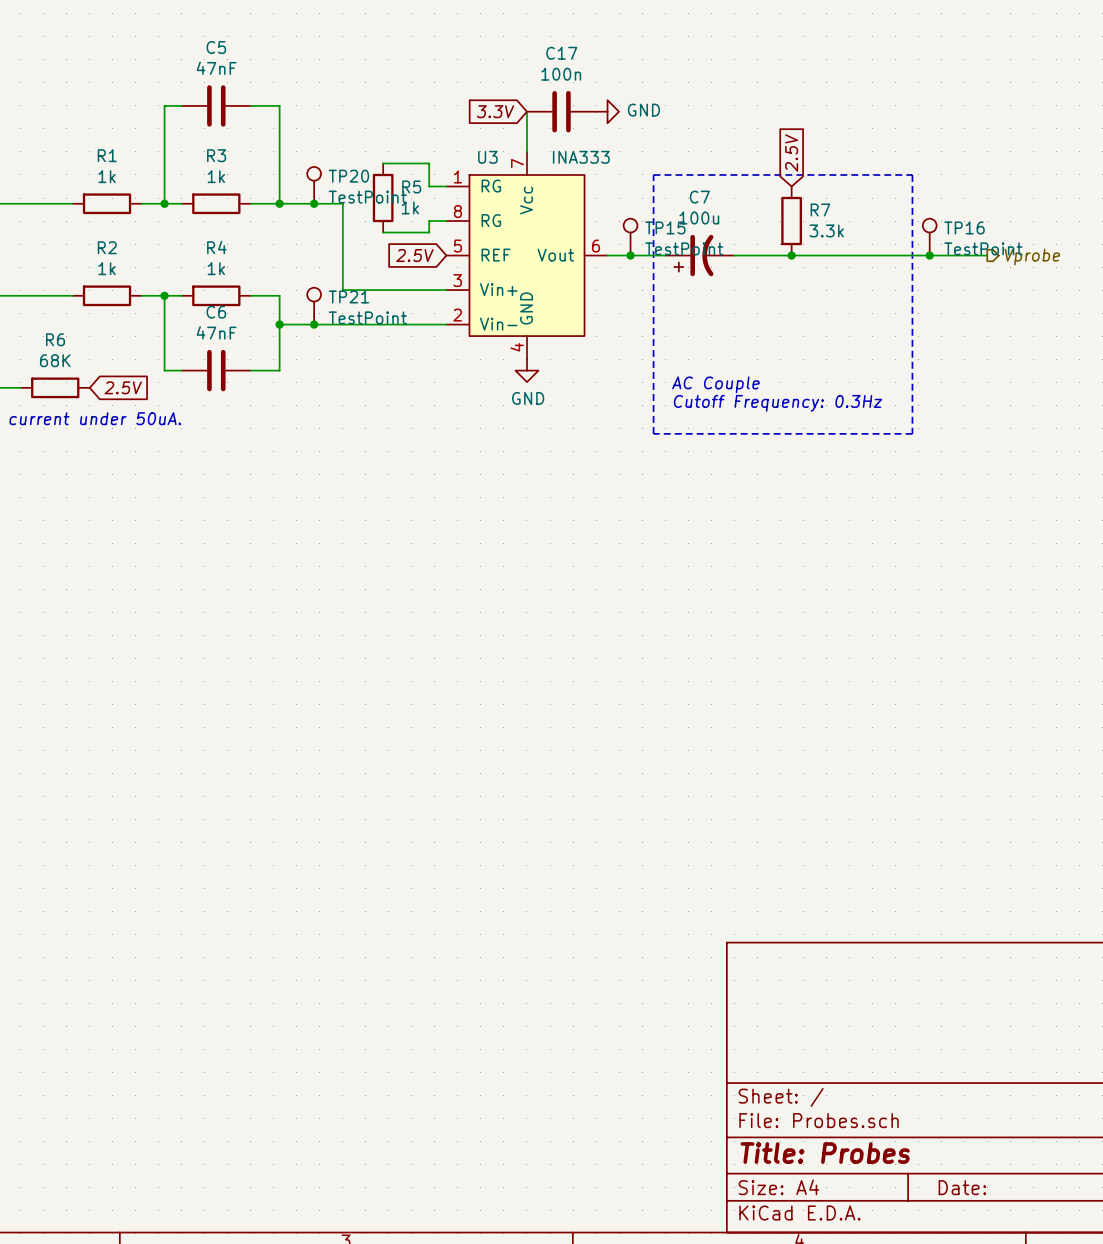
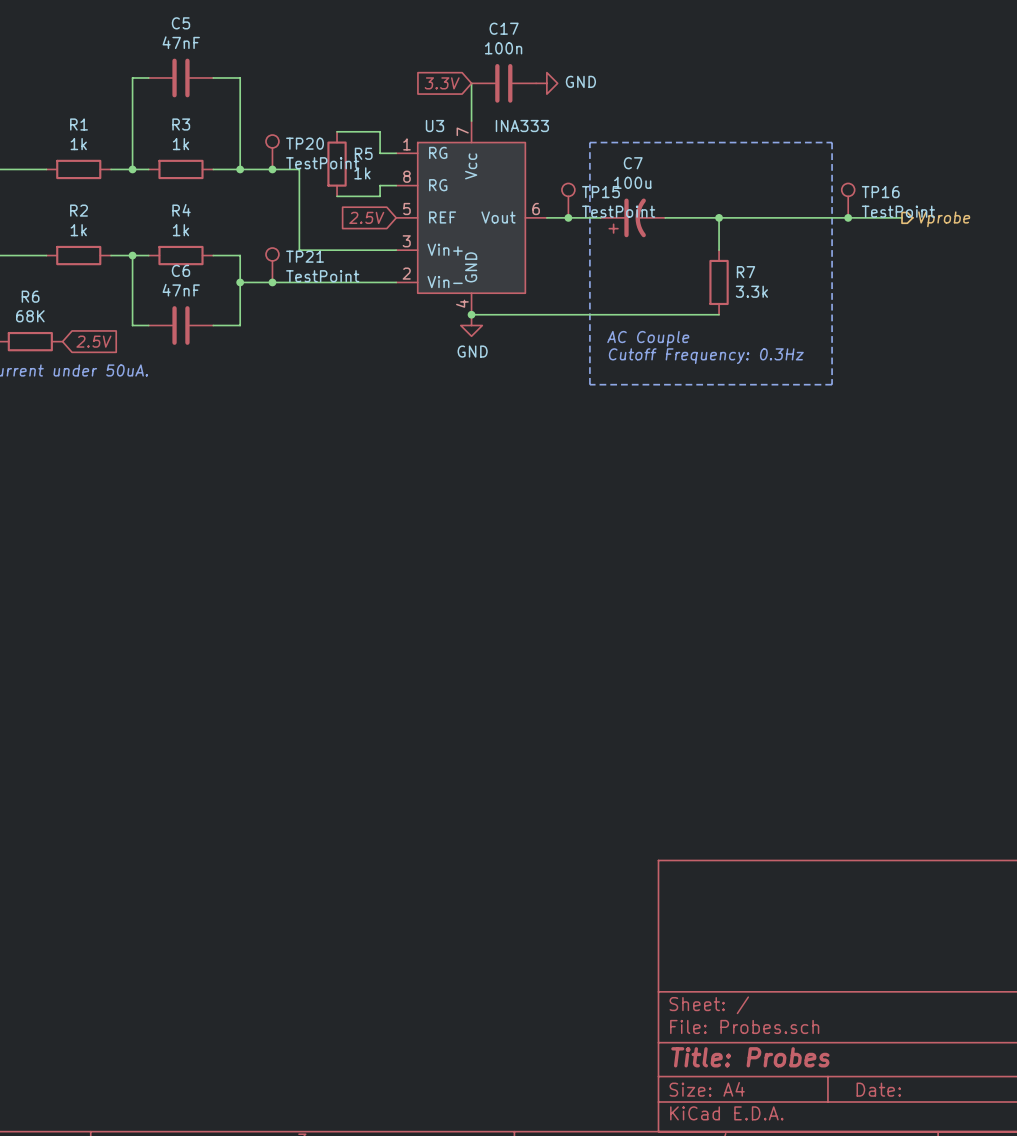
global label: 2.5V (791, 153) -> none
R7 position: (791, 221) -> (719, 282)
wire: none -> (719, 217) (719, 250)
wire: none -> (471, 314) (719, 314)
junction: none -> (471, 314)

